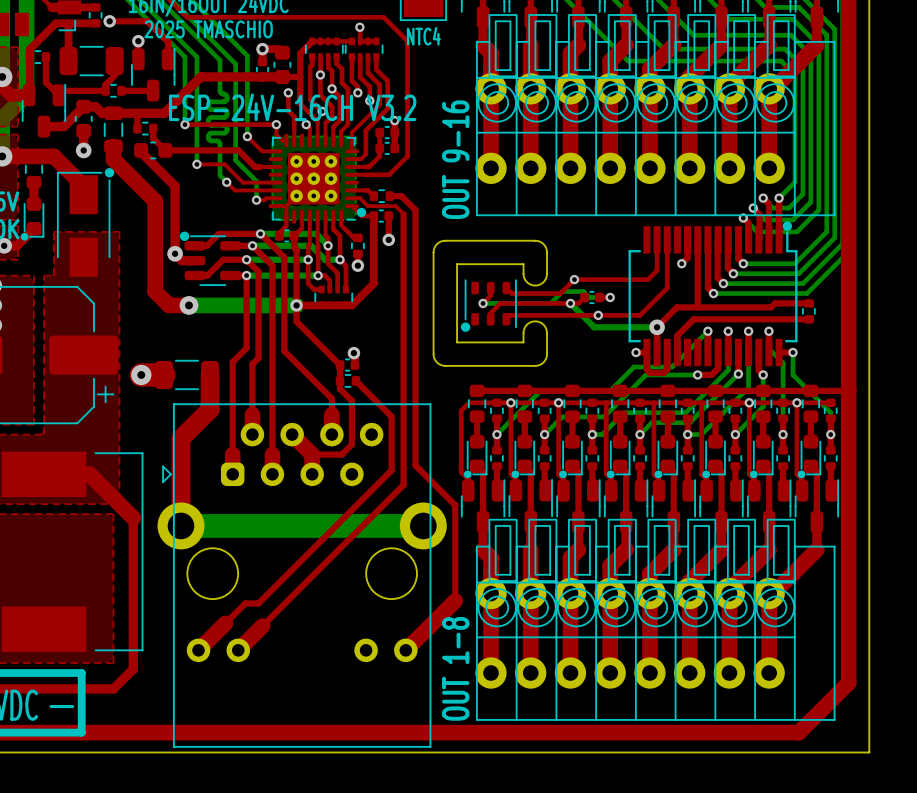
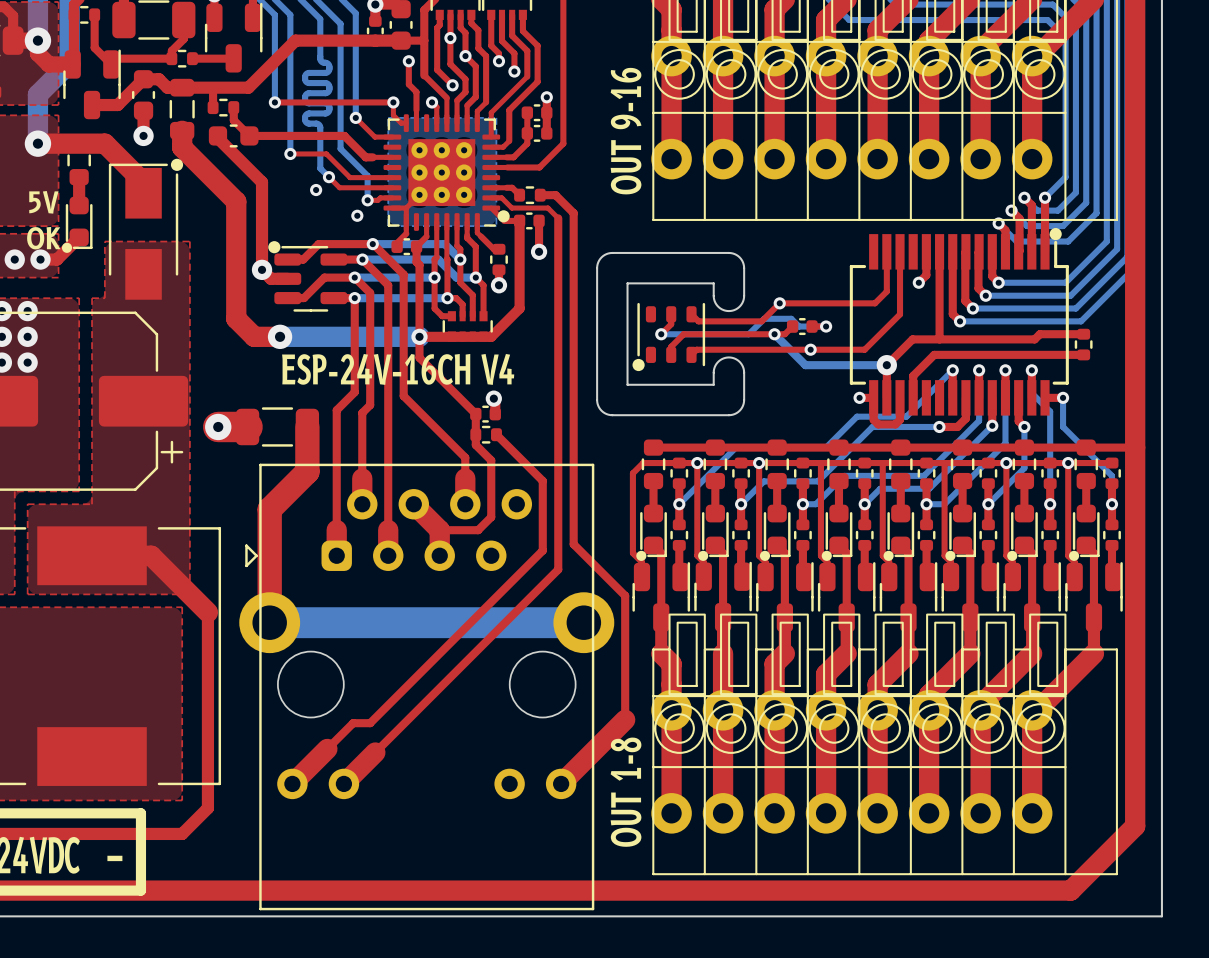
text: ESP-24V-16CH V3.2 (292, 107) -> none
via: none -> (316, 190)
via: none -> (357, 215)
text: none -> ESP-24V-16CH V4 (398, 369)

